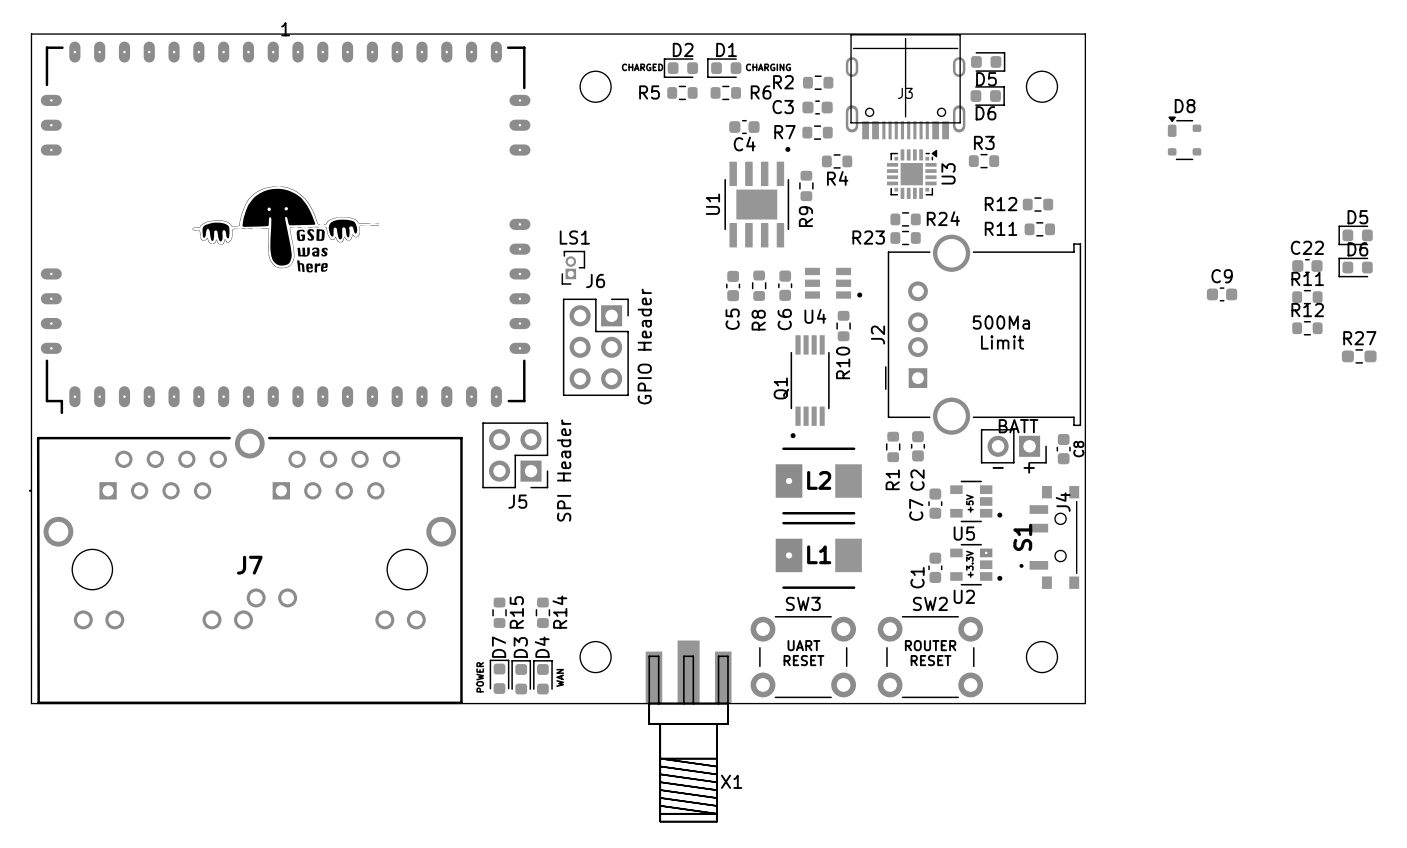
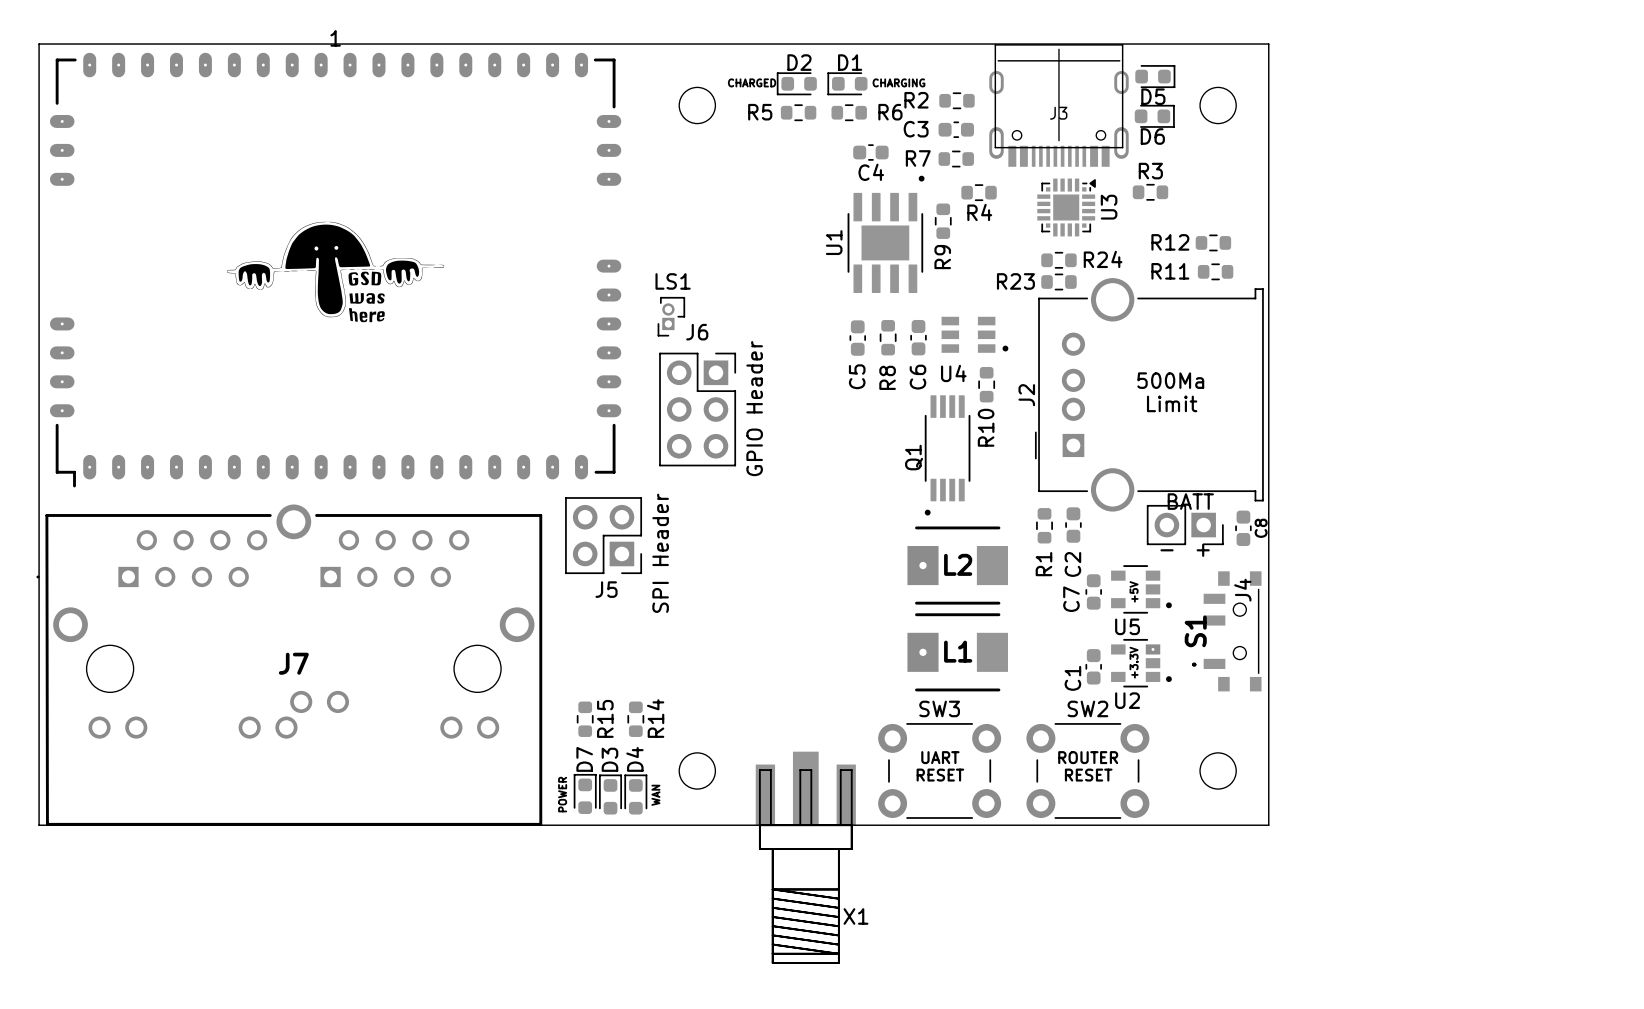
D8: (1184, 138) -> none
D5: (1355, 235) -> none
C22: (1307, 266) -> none
D6: (1355, 267) -> none
C9: (1222, 294) -> none
R11: (1307, 297) -> none
R12: (1307, 328) -> none
R27: (1359, 356) -> none

